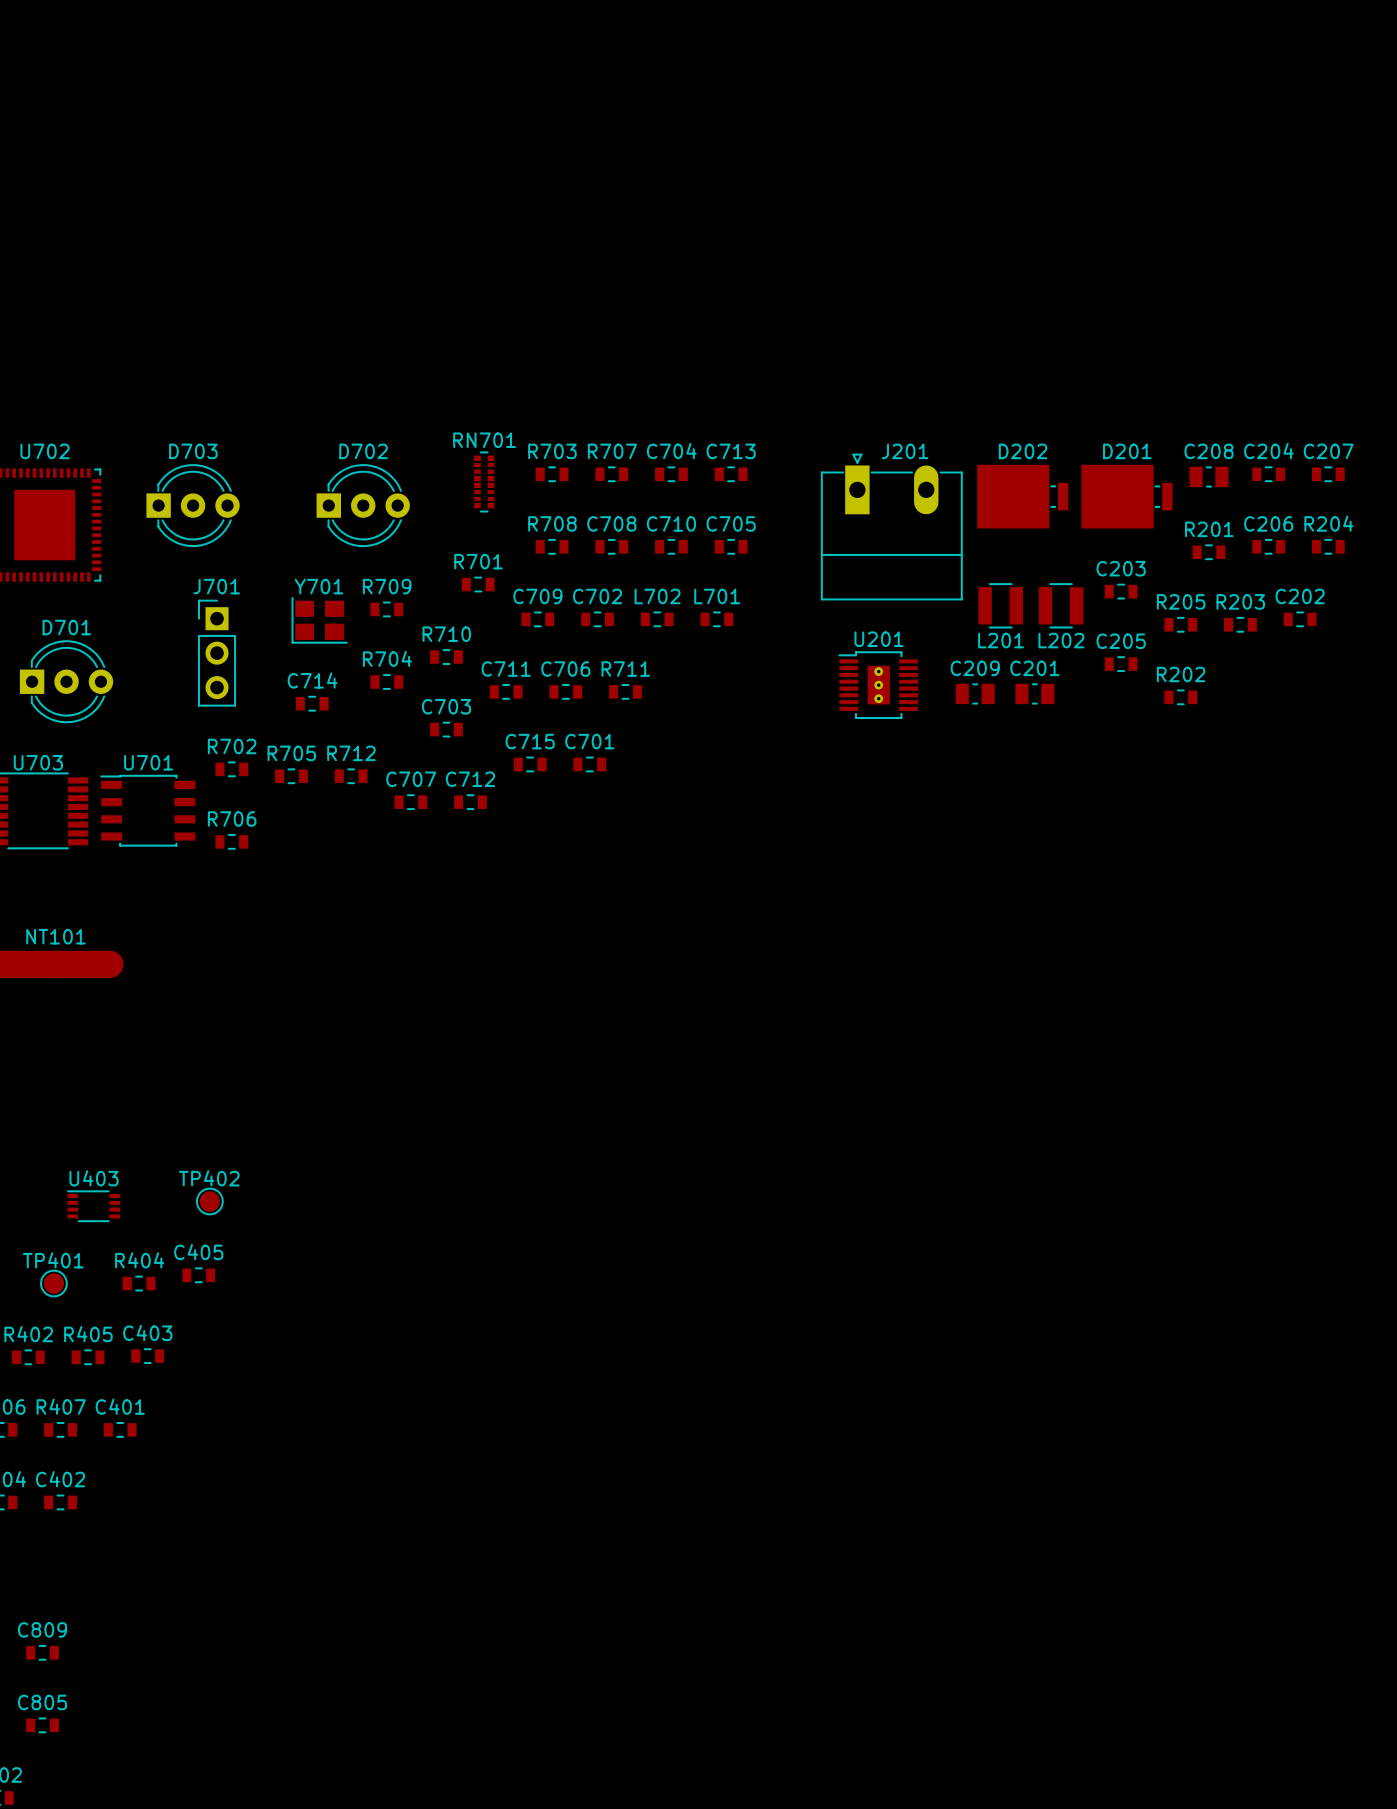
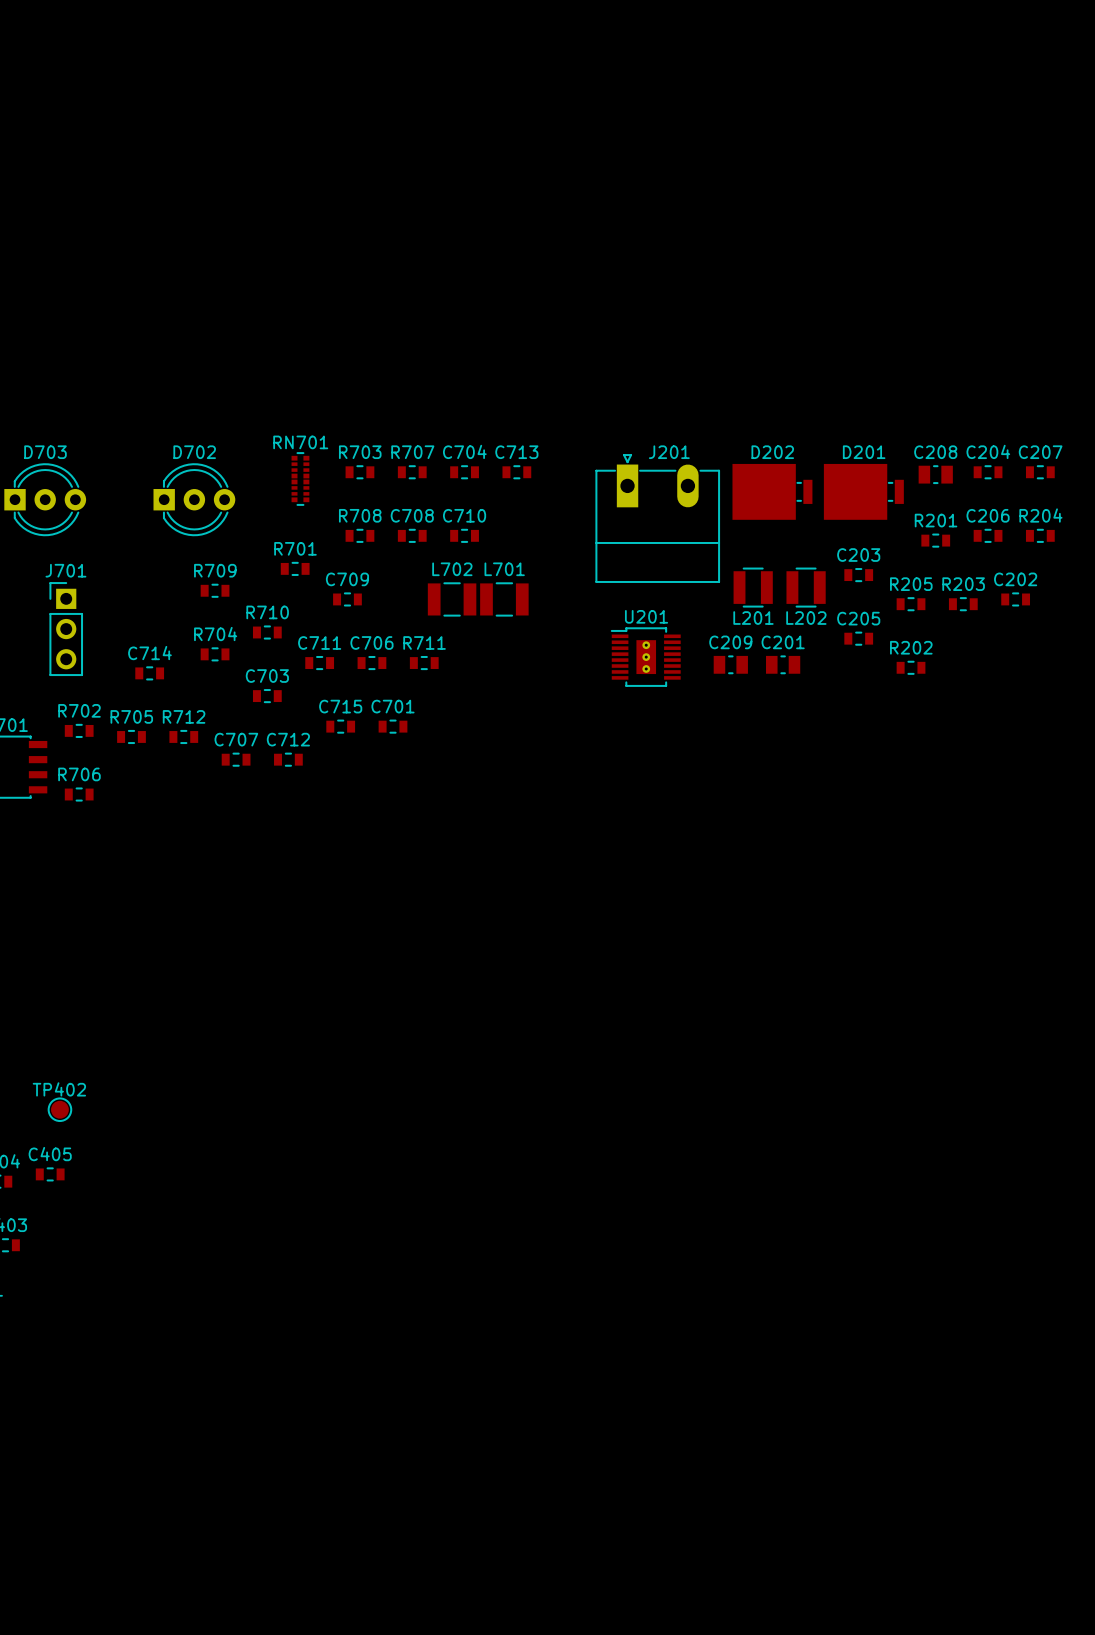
C705: (731, 546) -> none
L702 footprint: [640, 611, 674, 628] -> [427, 582, 477, 617]
L701 footprint: [700, 611, 734, 628] -> [480, 582, 529, 617]
C702: (597, 619) -> none
Y701: (319, 620) -> none

